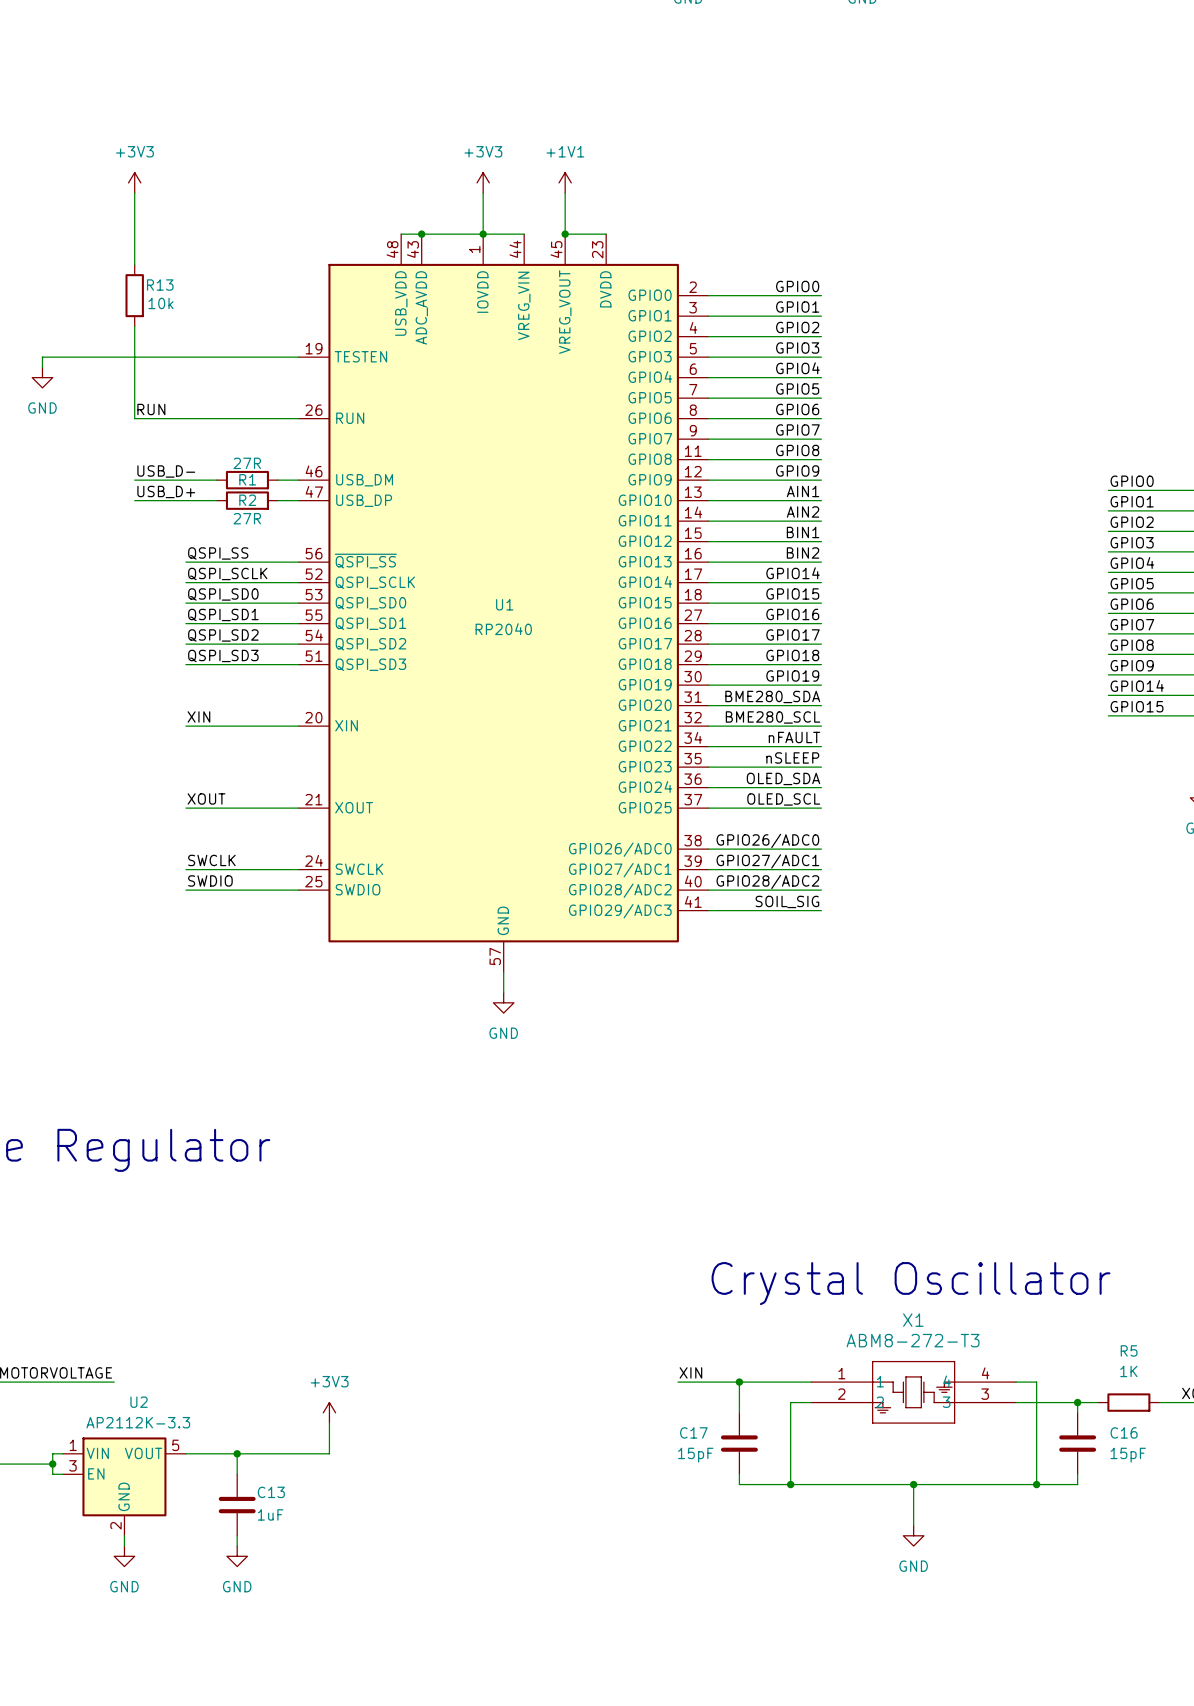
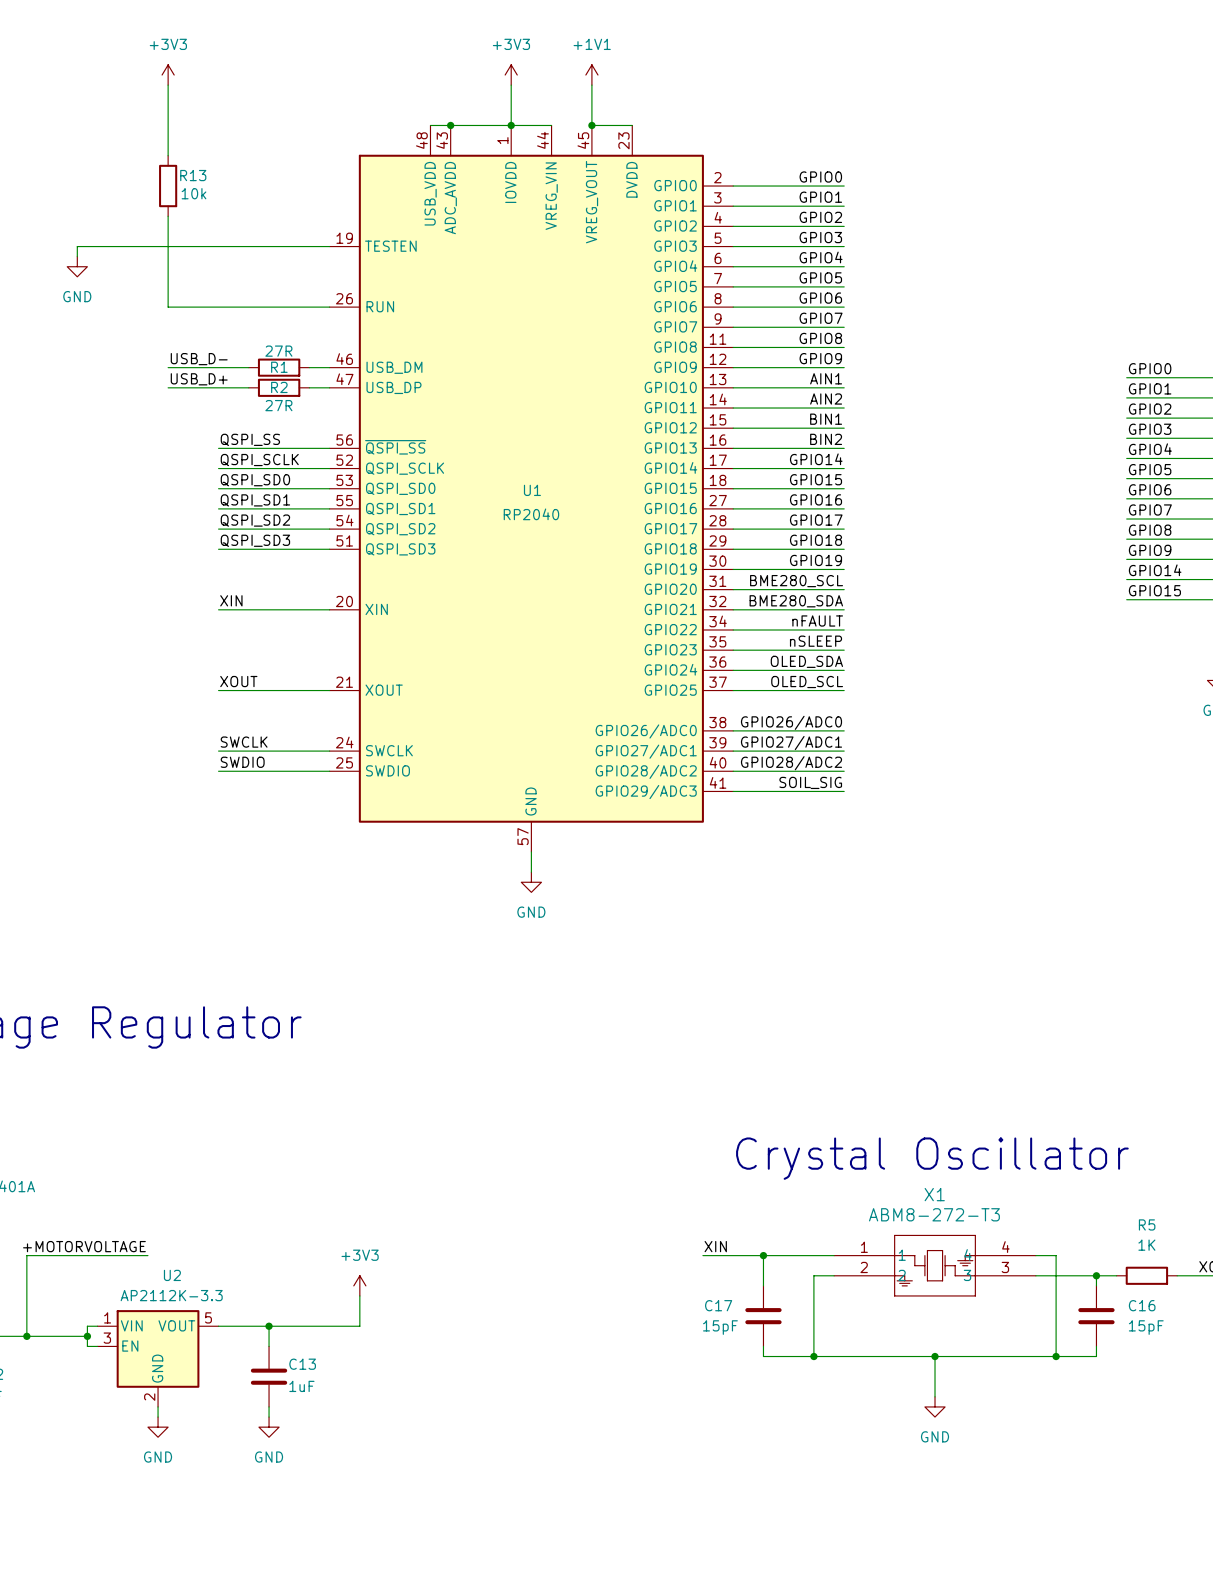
label: RUN (151, 409) -> none
label: BME280_SDA (772, 696) -> BME280_SCL (796, 581)
label: BME280_SCL (773, 717) -> BME280_SDA (796, 601)

